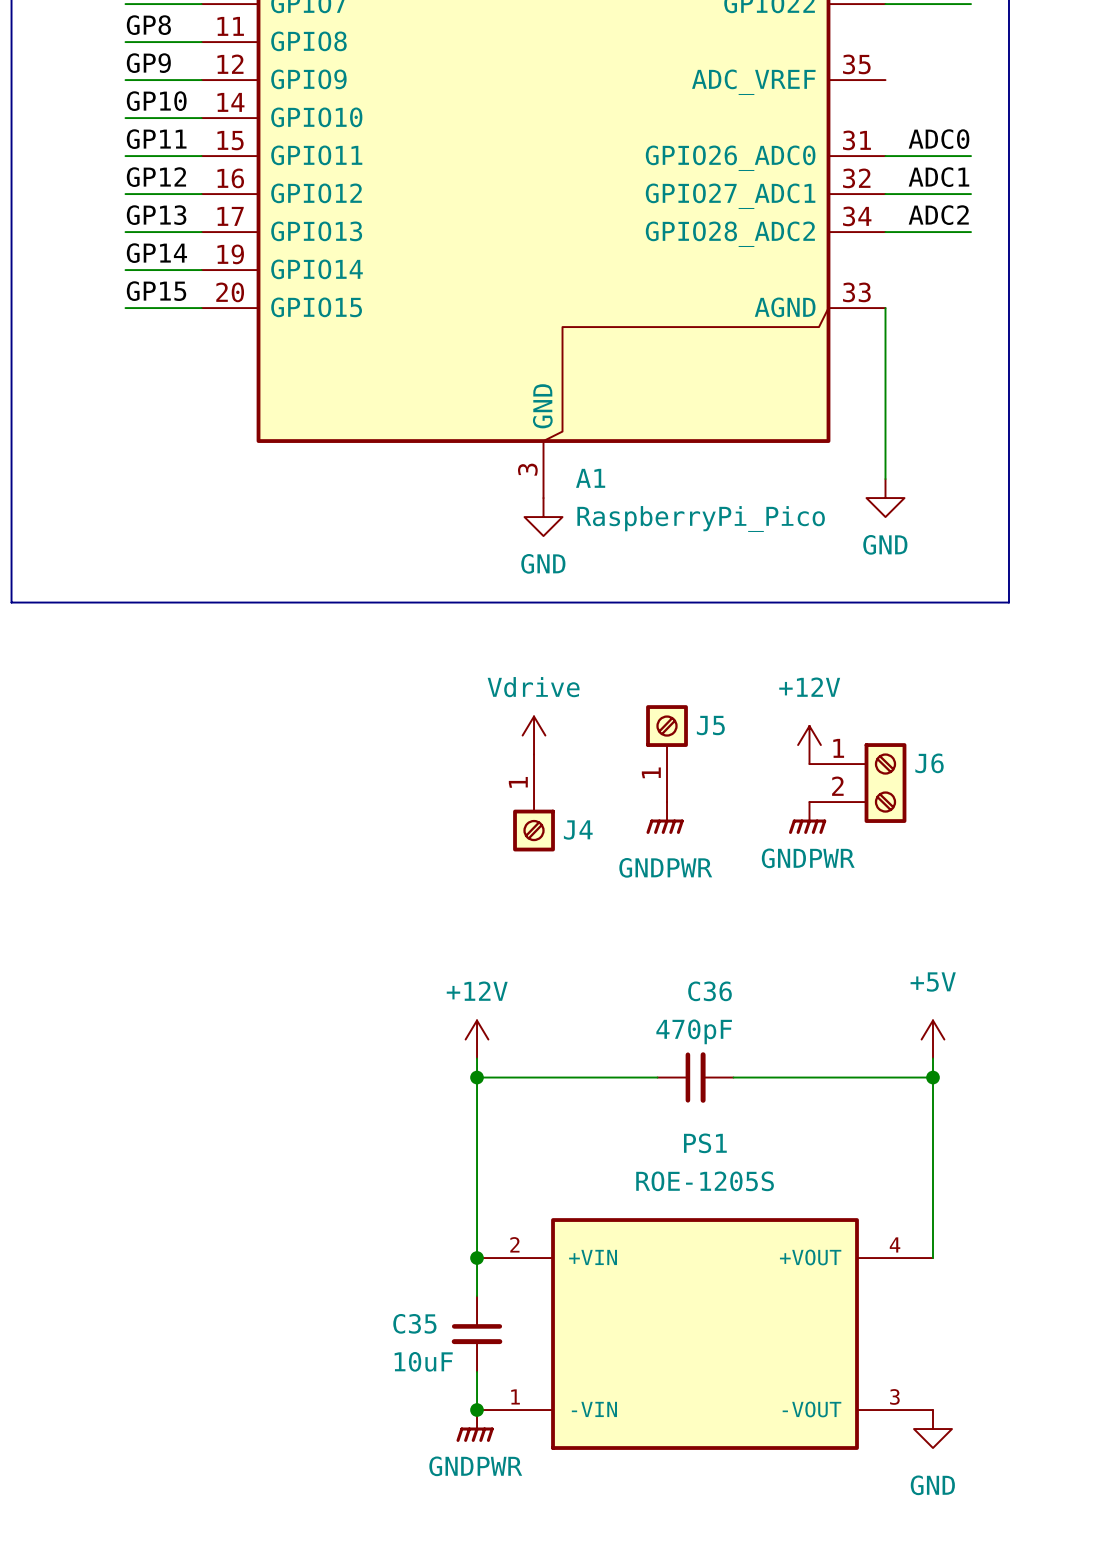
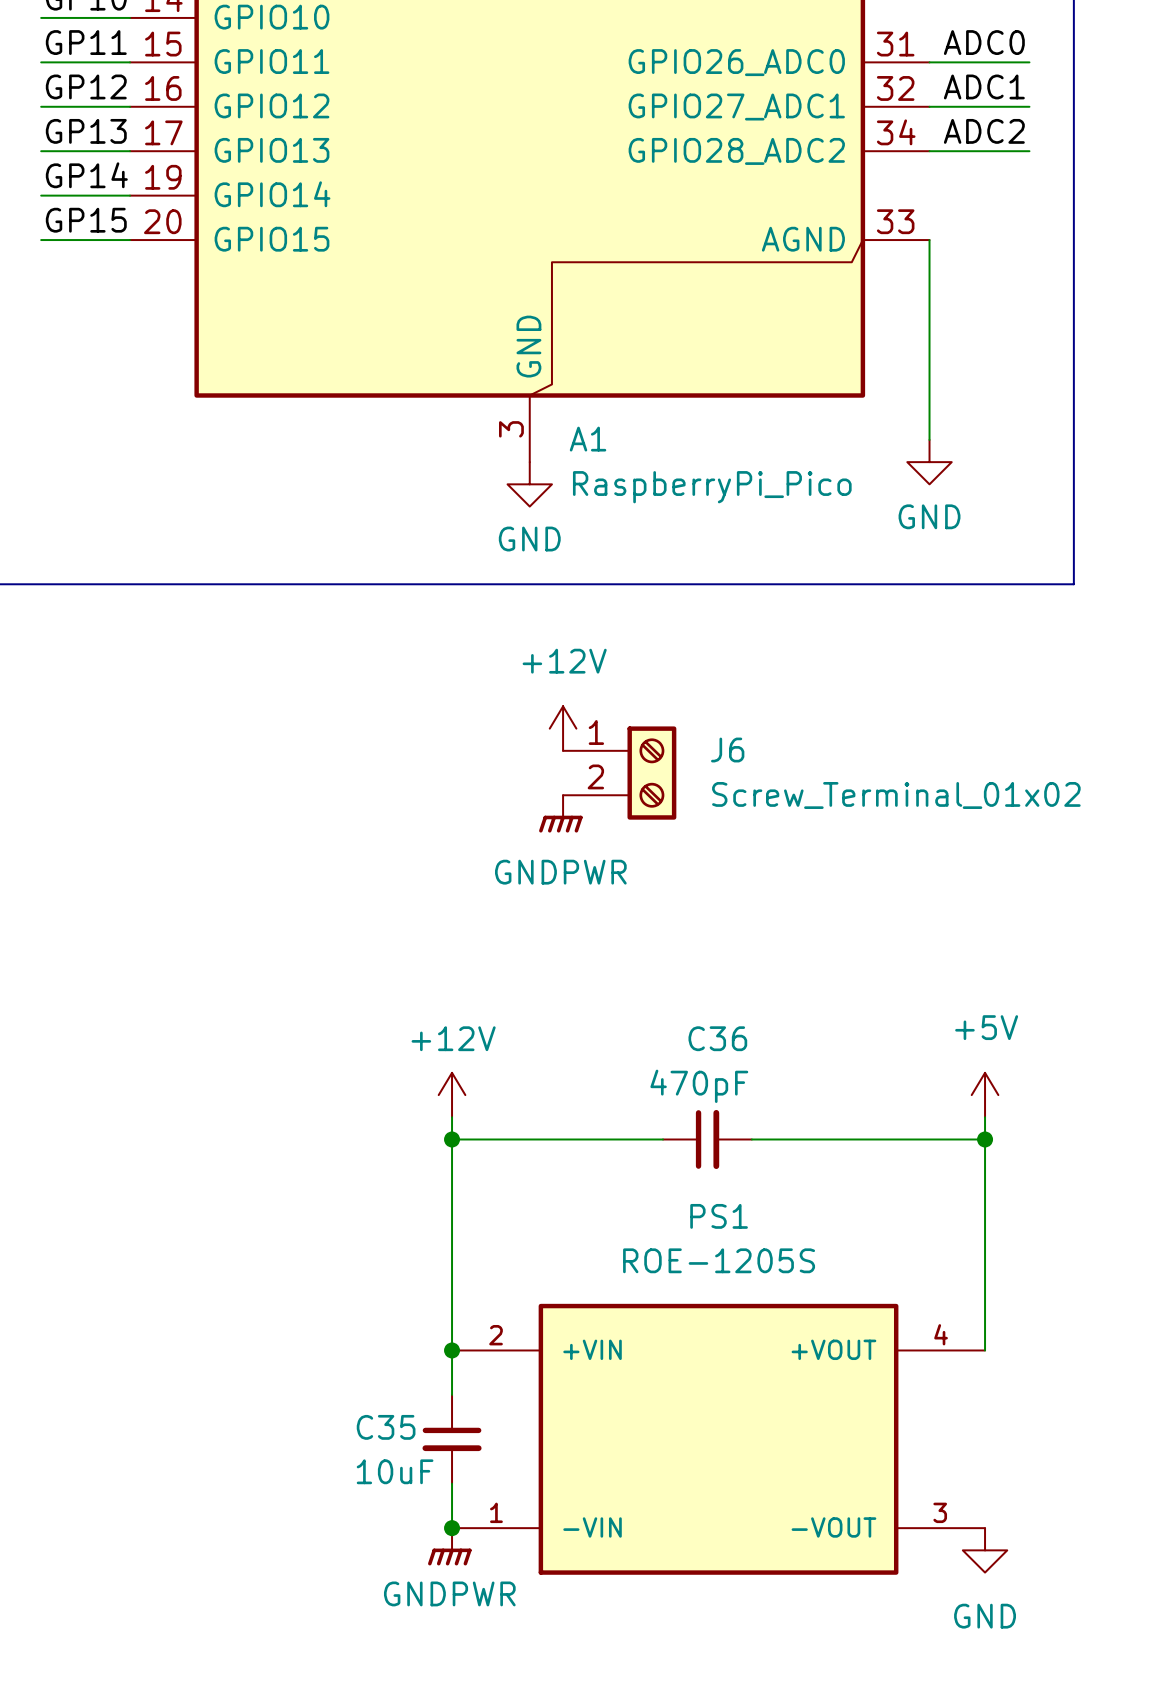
power symbol: Vdrive (534, 735) -> none
power symbol position: +12V (809, 745) -> +12V (563, 728)
J5: (667, 753) -> none
J6 name position: J6 (929, 763) -> J6 (727, 750)
J6 position: (857, 783) -> (619, 773)
J6 value: none -> Screw_Terminal_01x02 (896, 795)
J4: (534, 802) -> none
power symbol position: GNDPWR (665, 818) -> GNDPWR (560, 813)
power symbol: GNDPWR (807, 818) -> none

